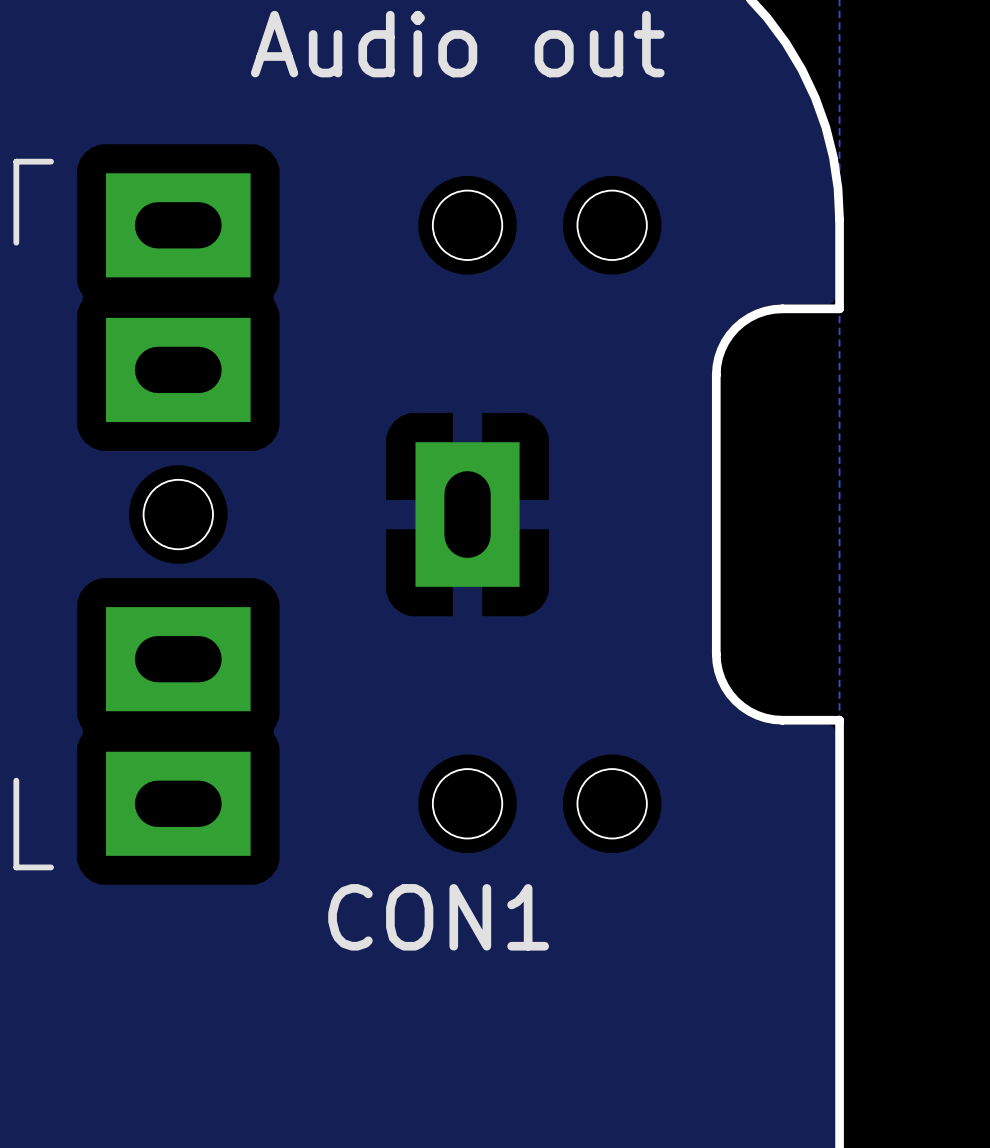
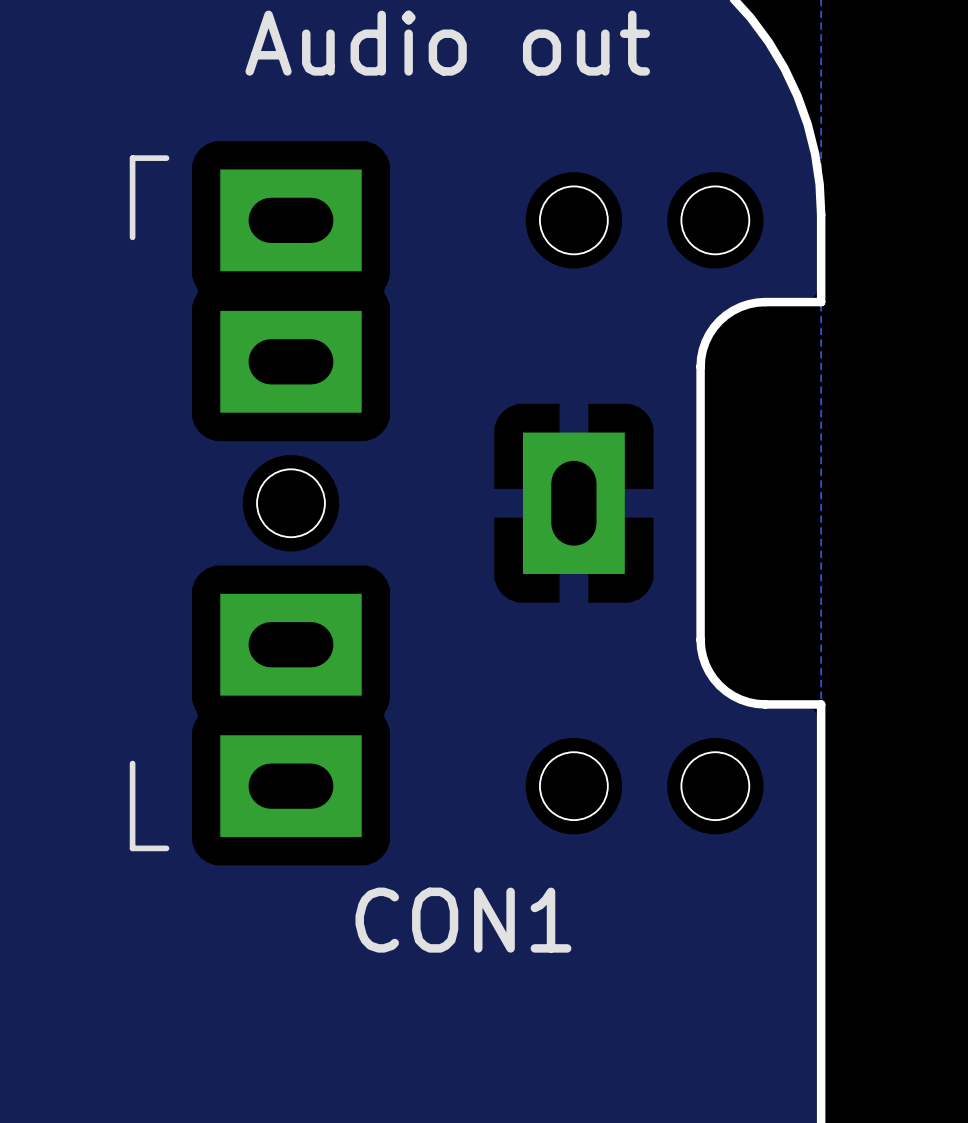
CON1 position: (330, 514) -> (439, 503)
CON1 name position: CON1 (438, 917) -> CON1 (463, 920)

